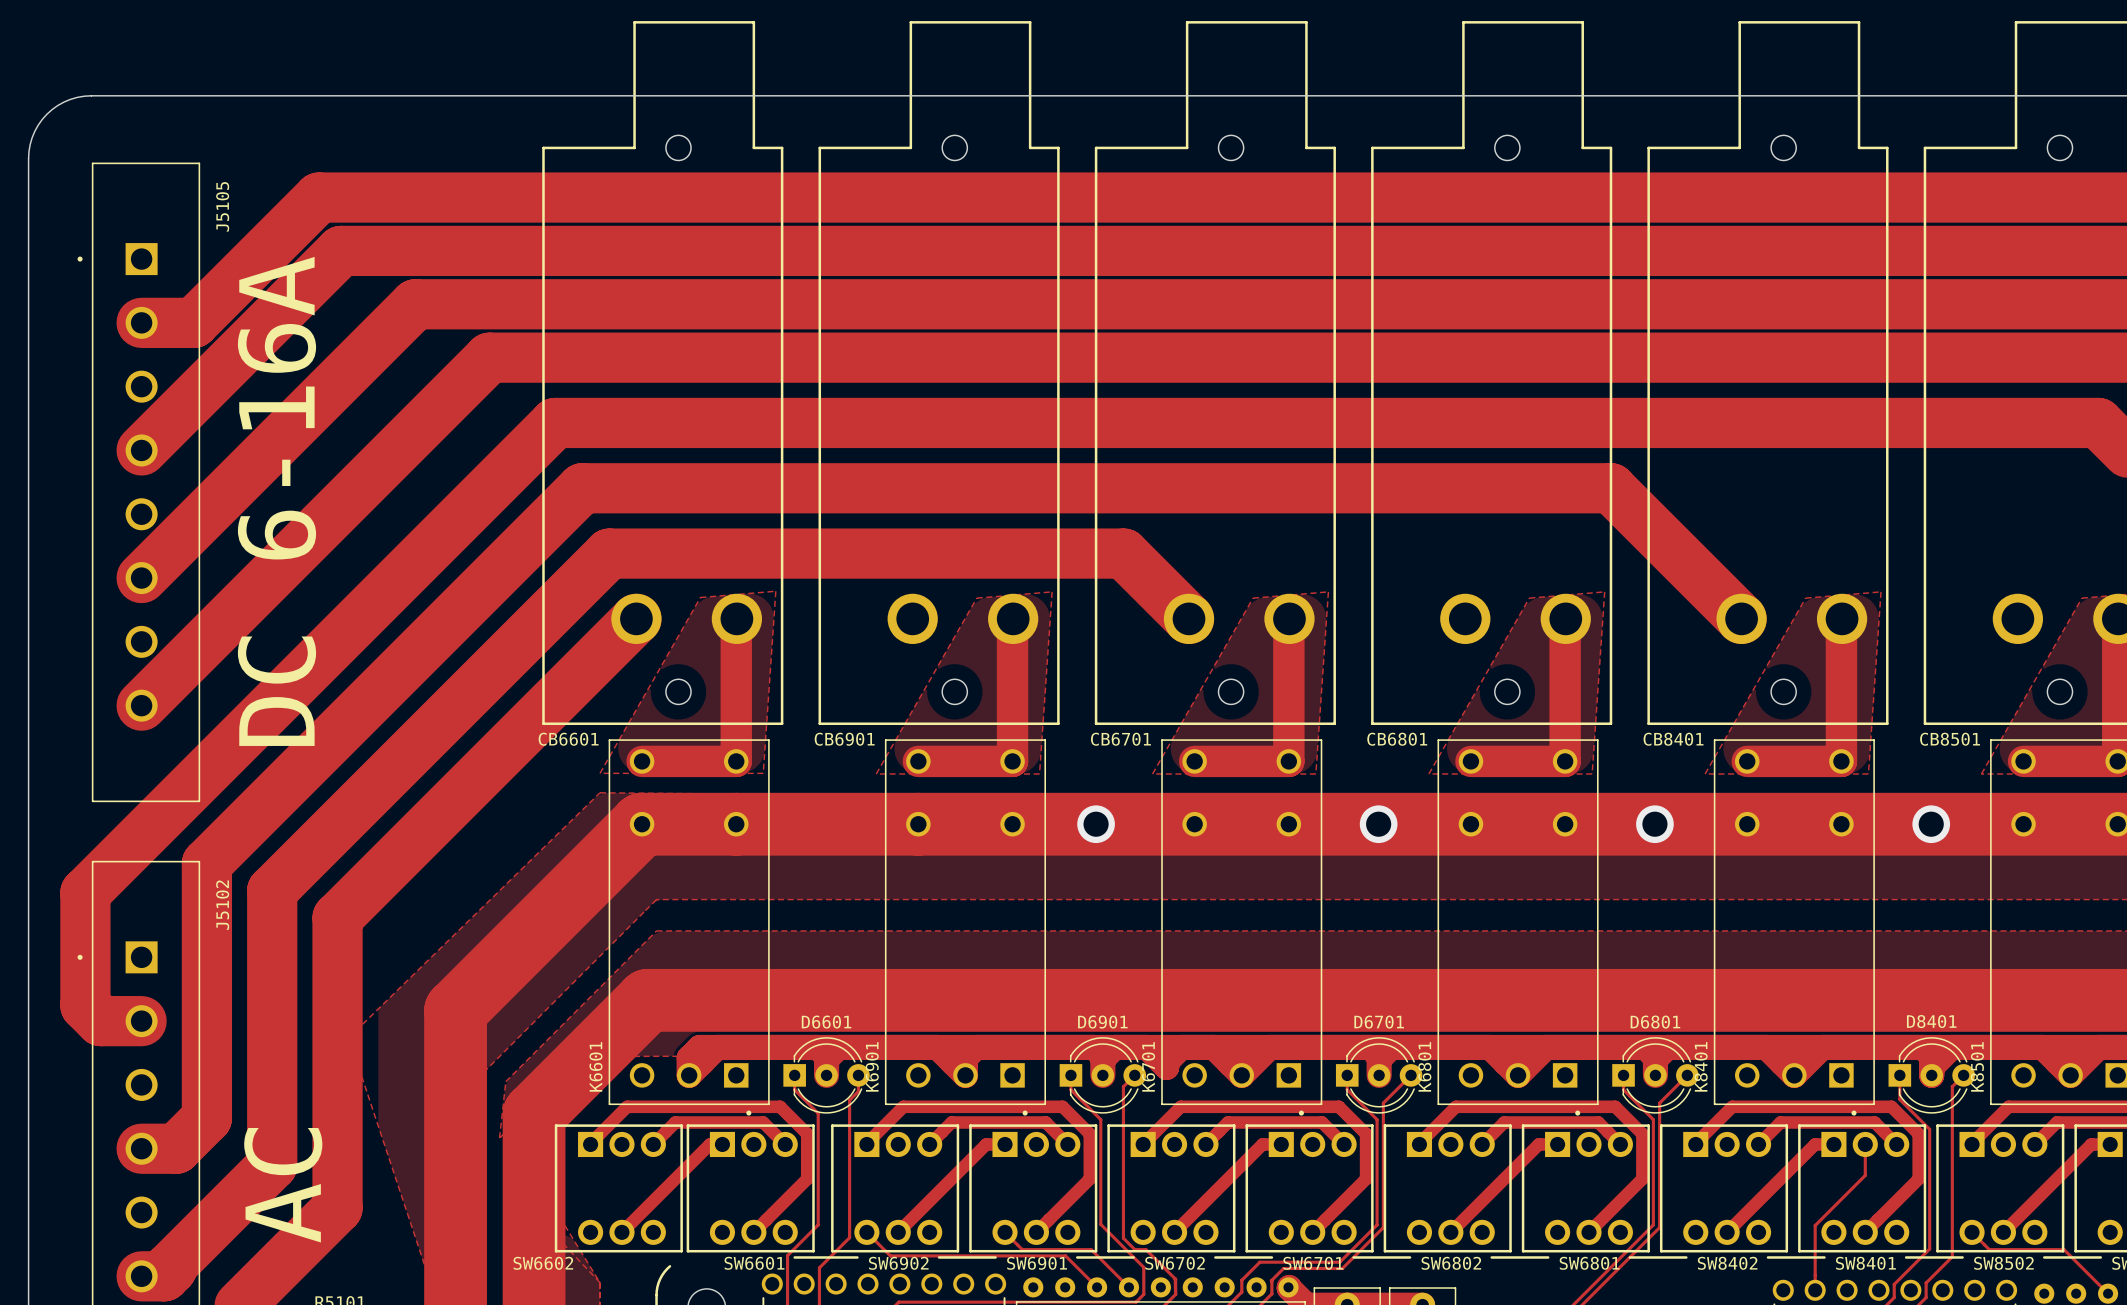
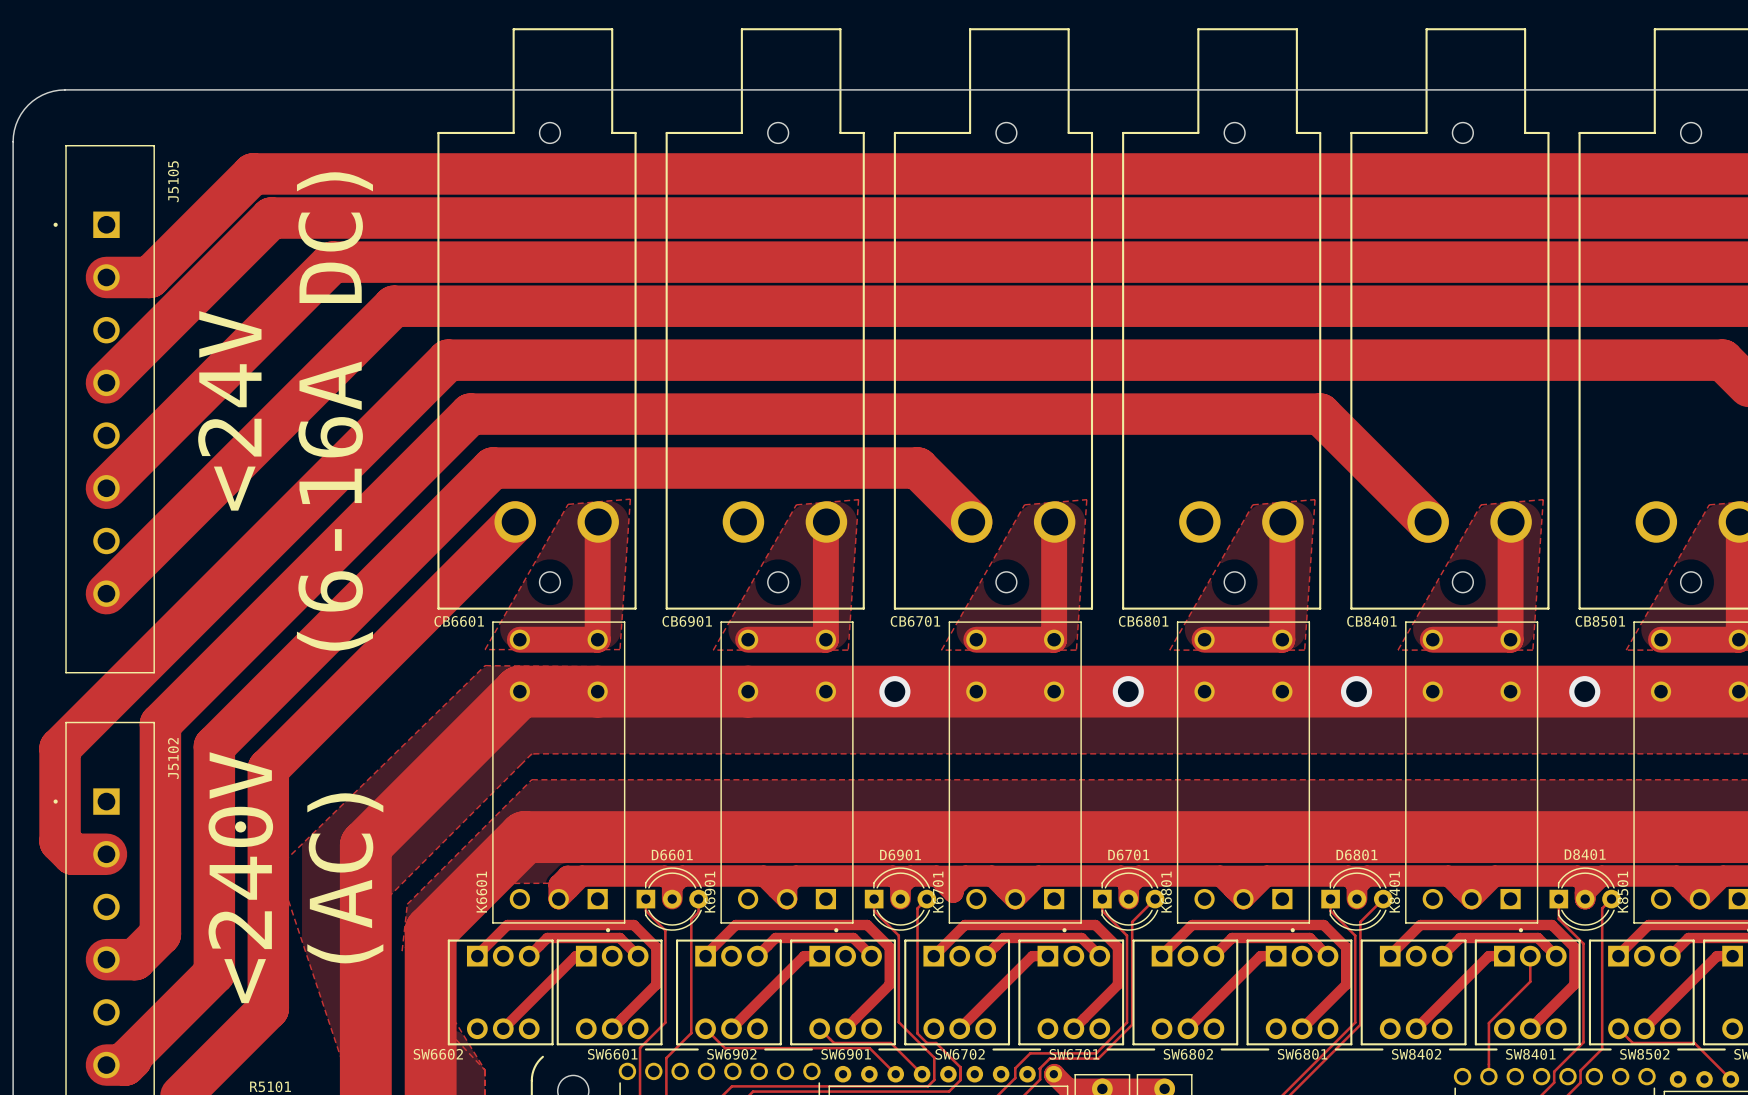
text: none -> <24V (229, 410)
text: none -> (6-16A DC) (334, 411)
text: DC 6-16A (276, 501) -> none
text: none -> <240V (240, 877)
text: AC (283, 1185) -> (AC) (345, 878)

